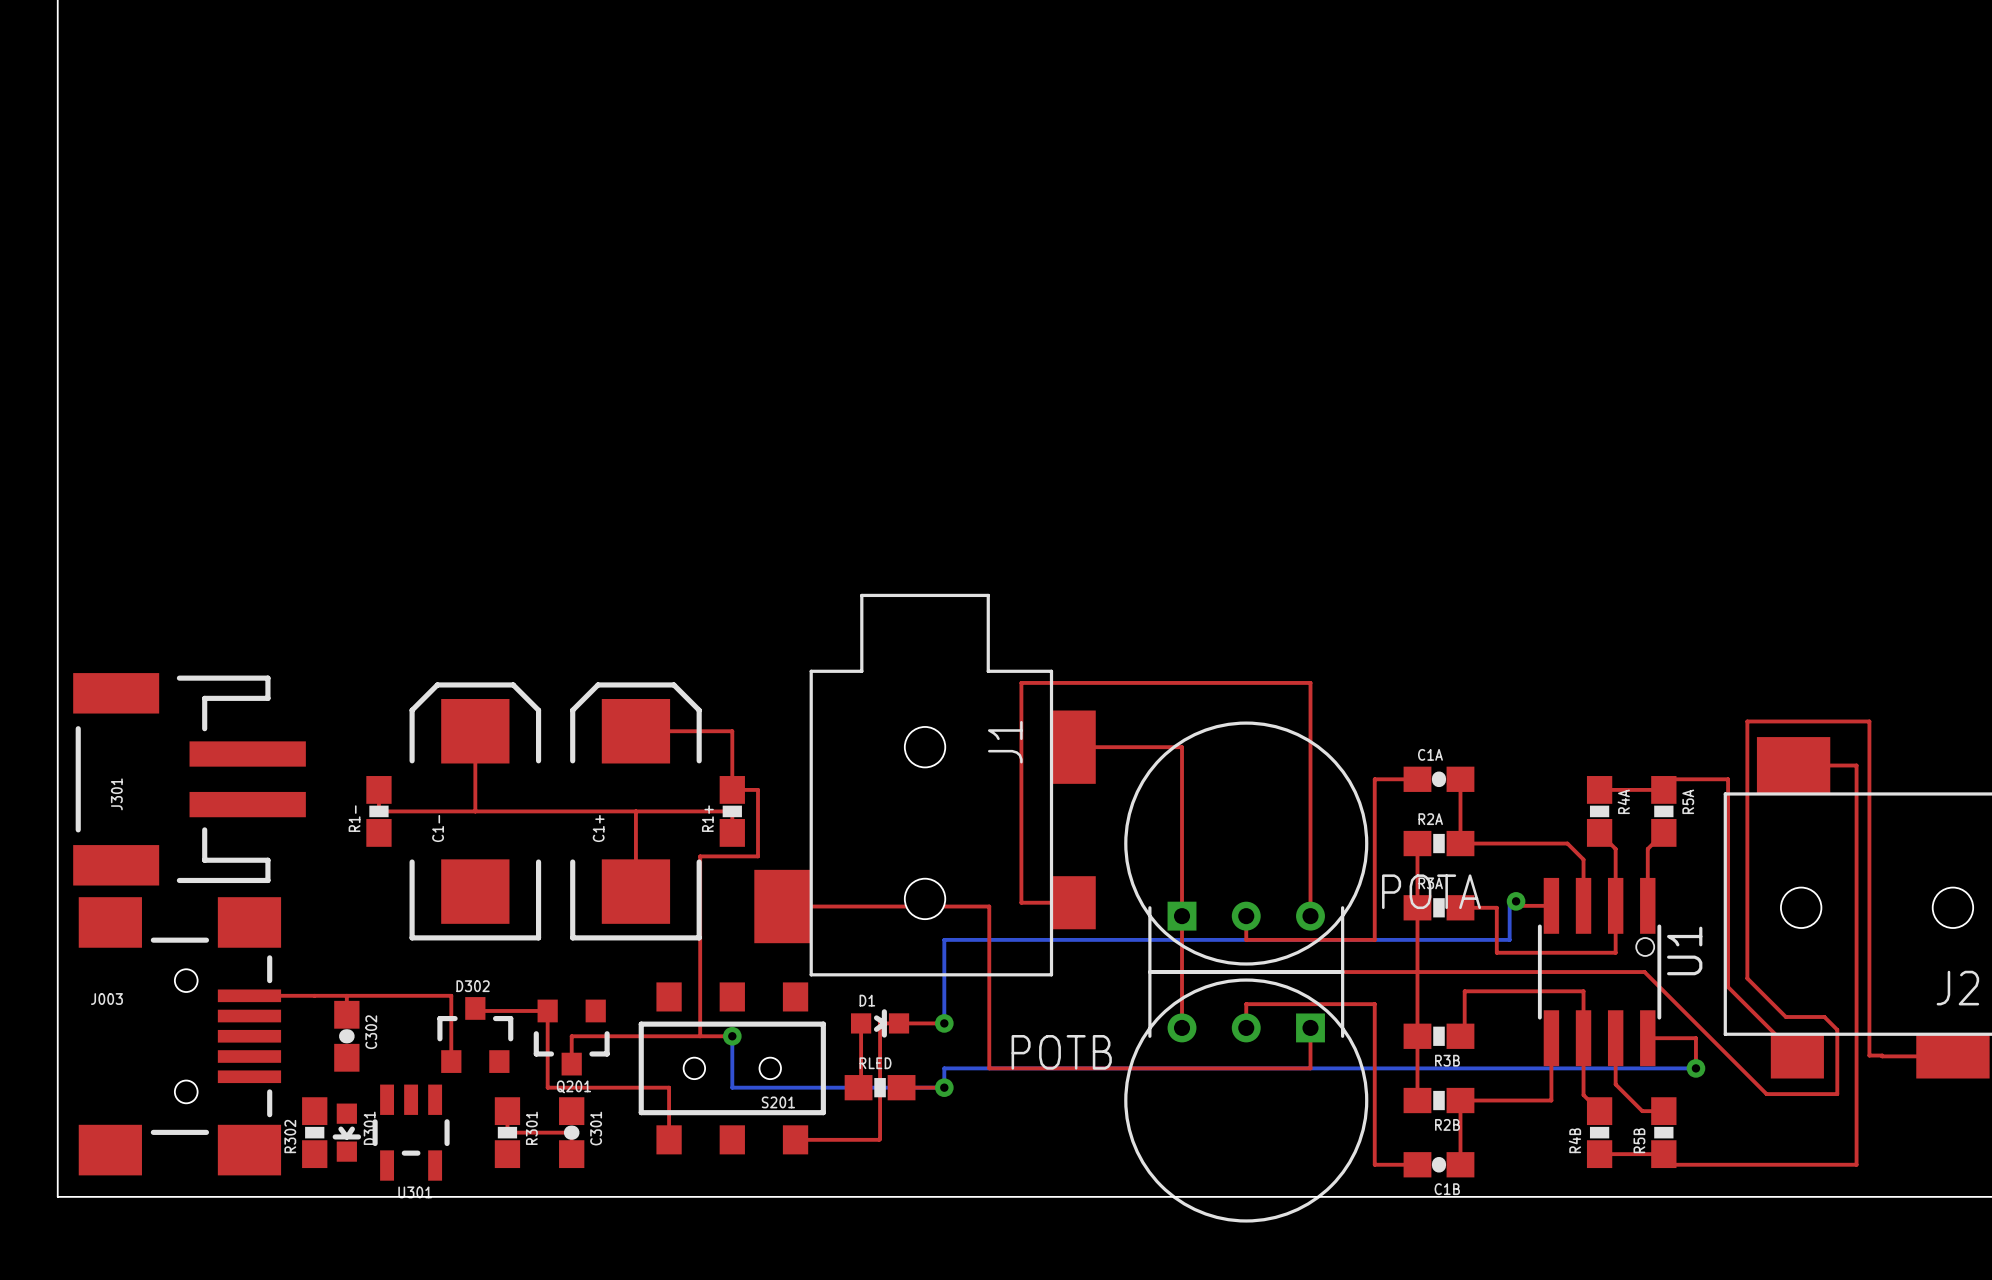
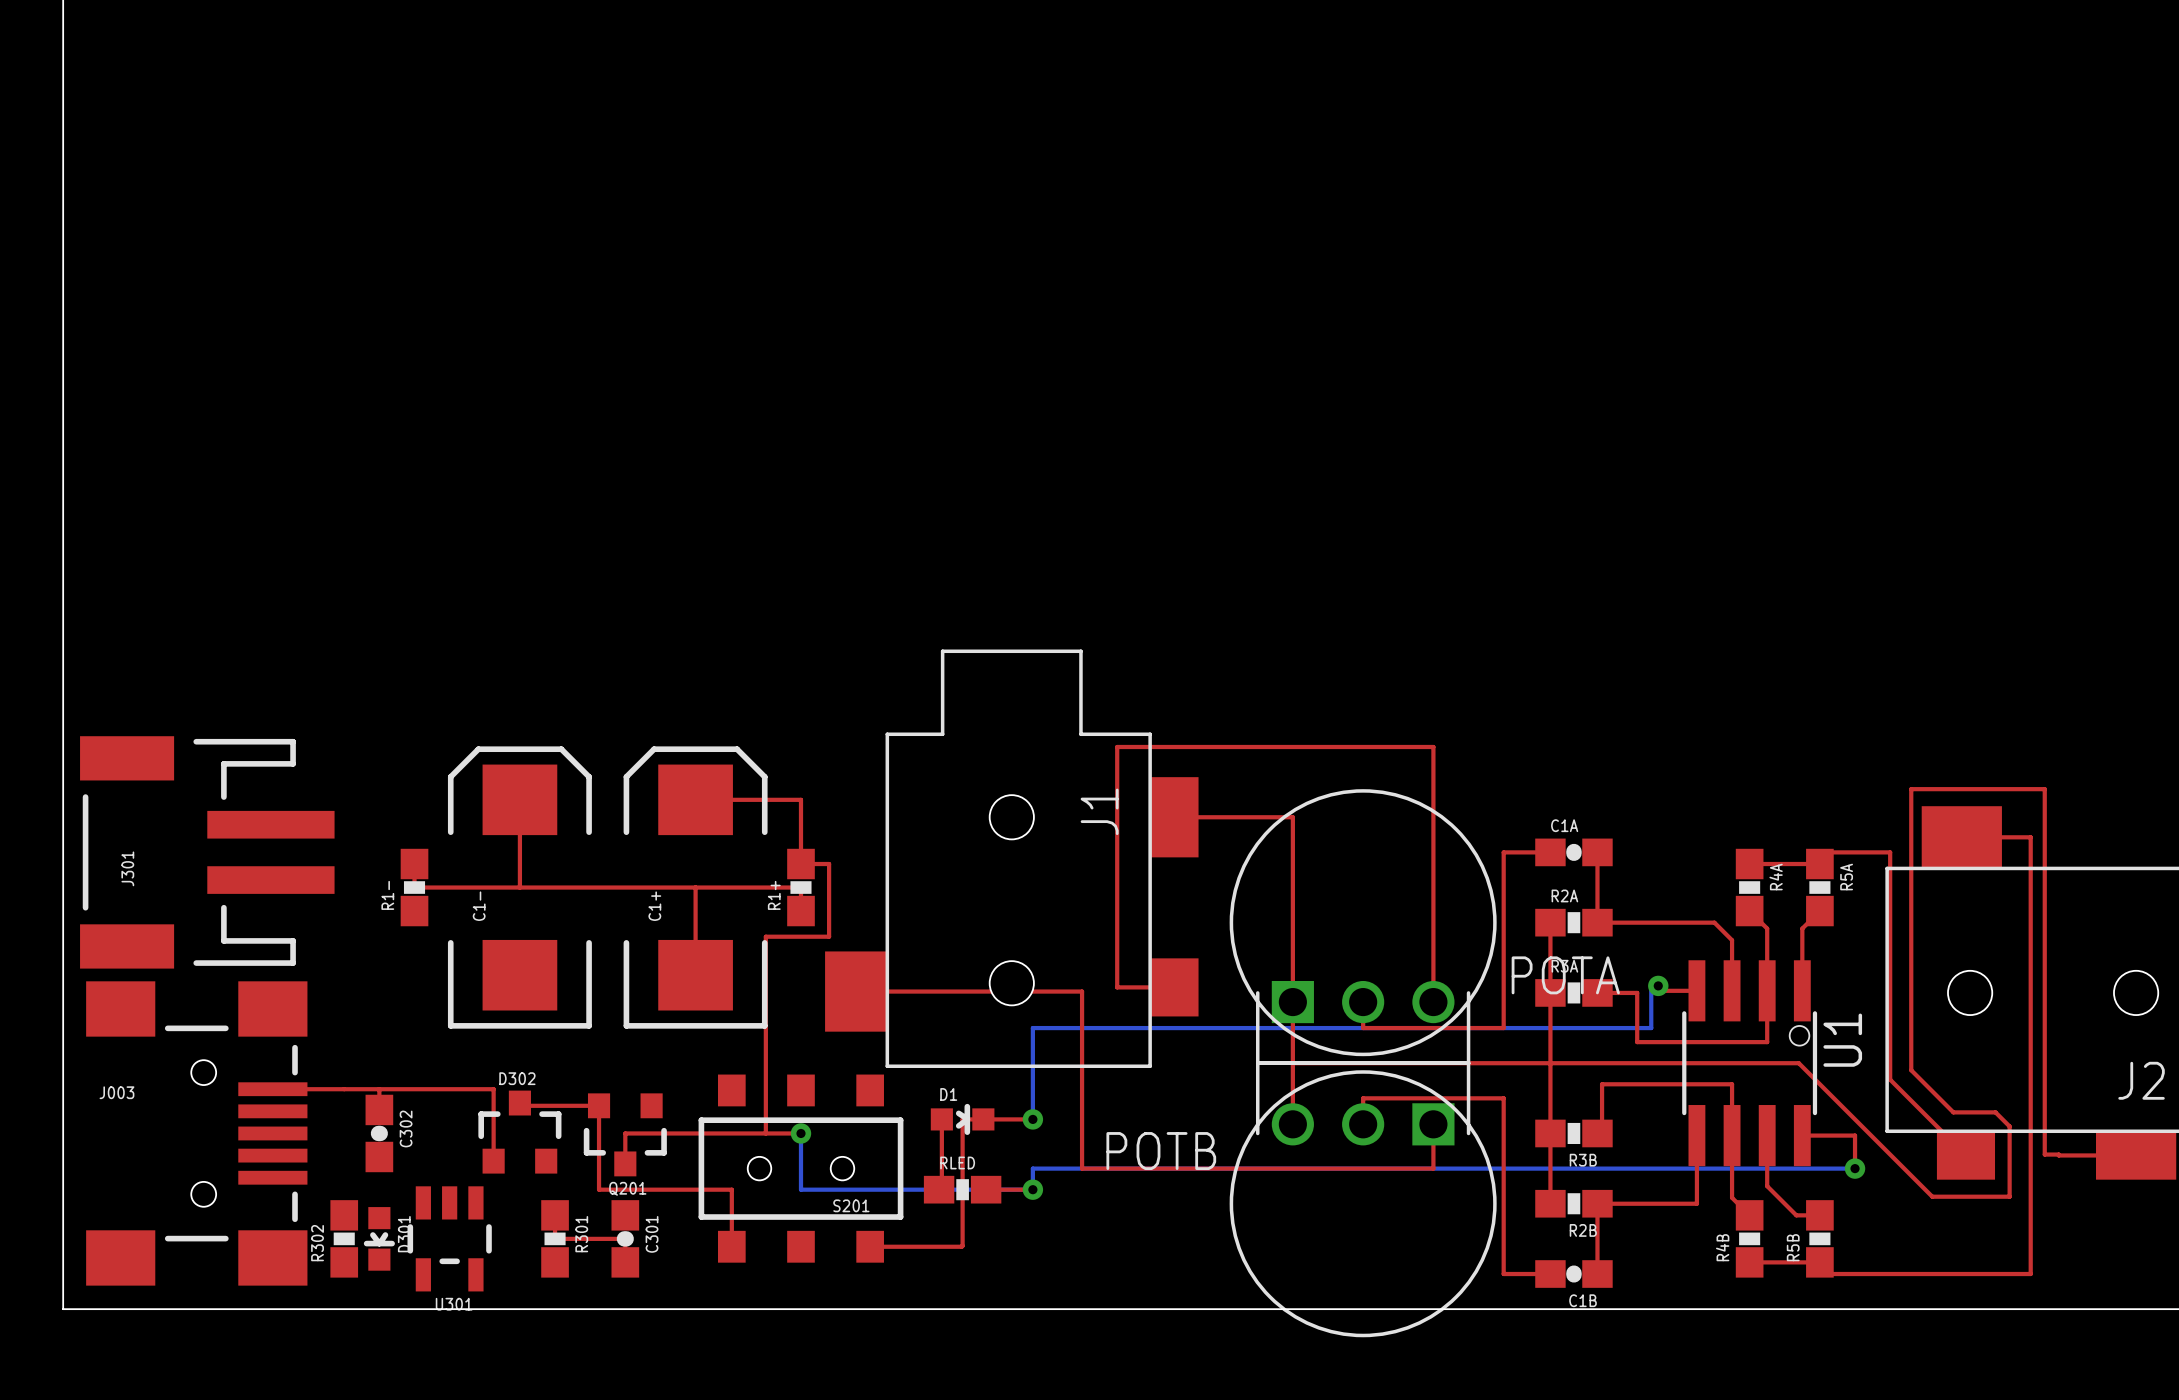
POTA footprint: [1124, 721, 1369, 974] -> [1229, 789, 1497, 1065]
POTB footprint: [1124, 970, 1369, 1223] -> [1229, 1061, 1497, 1338]

